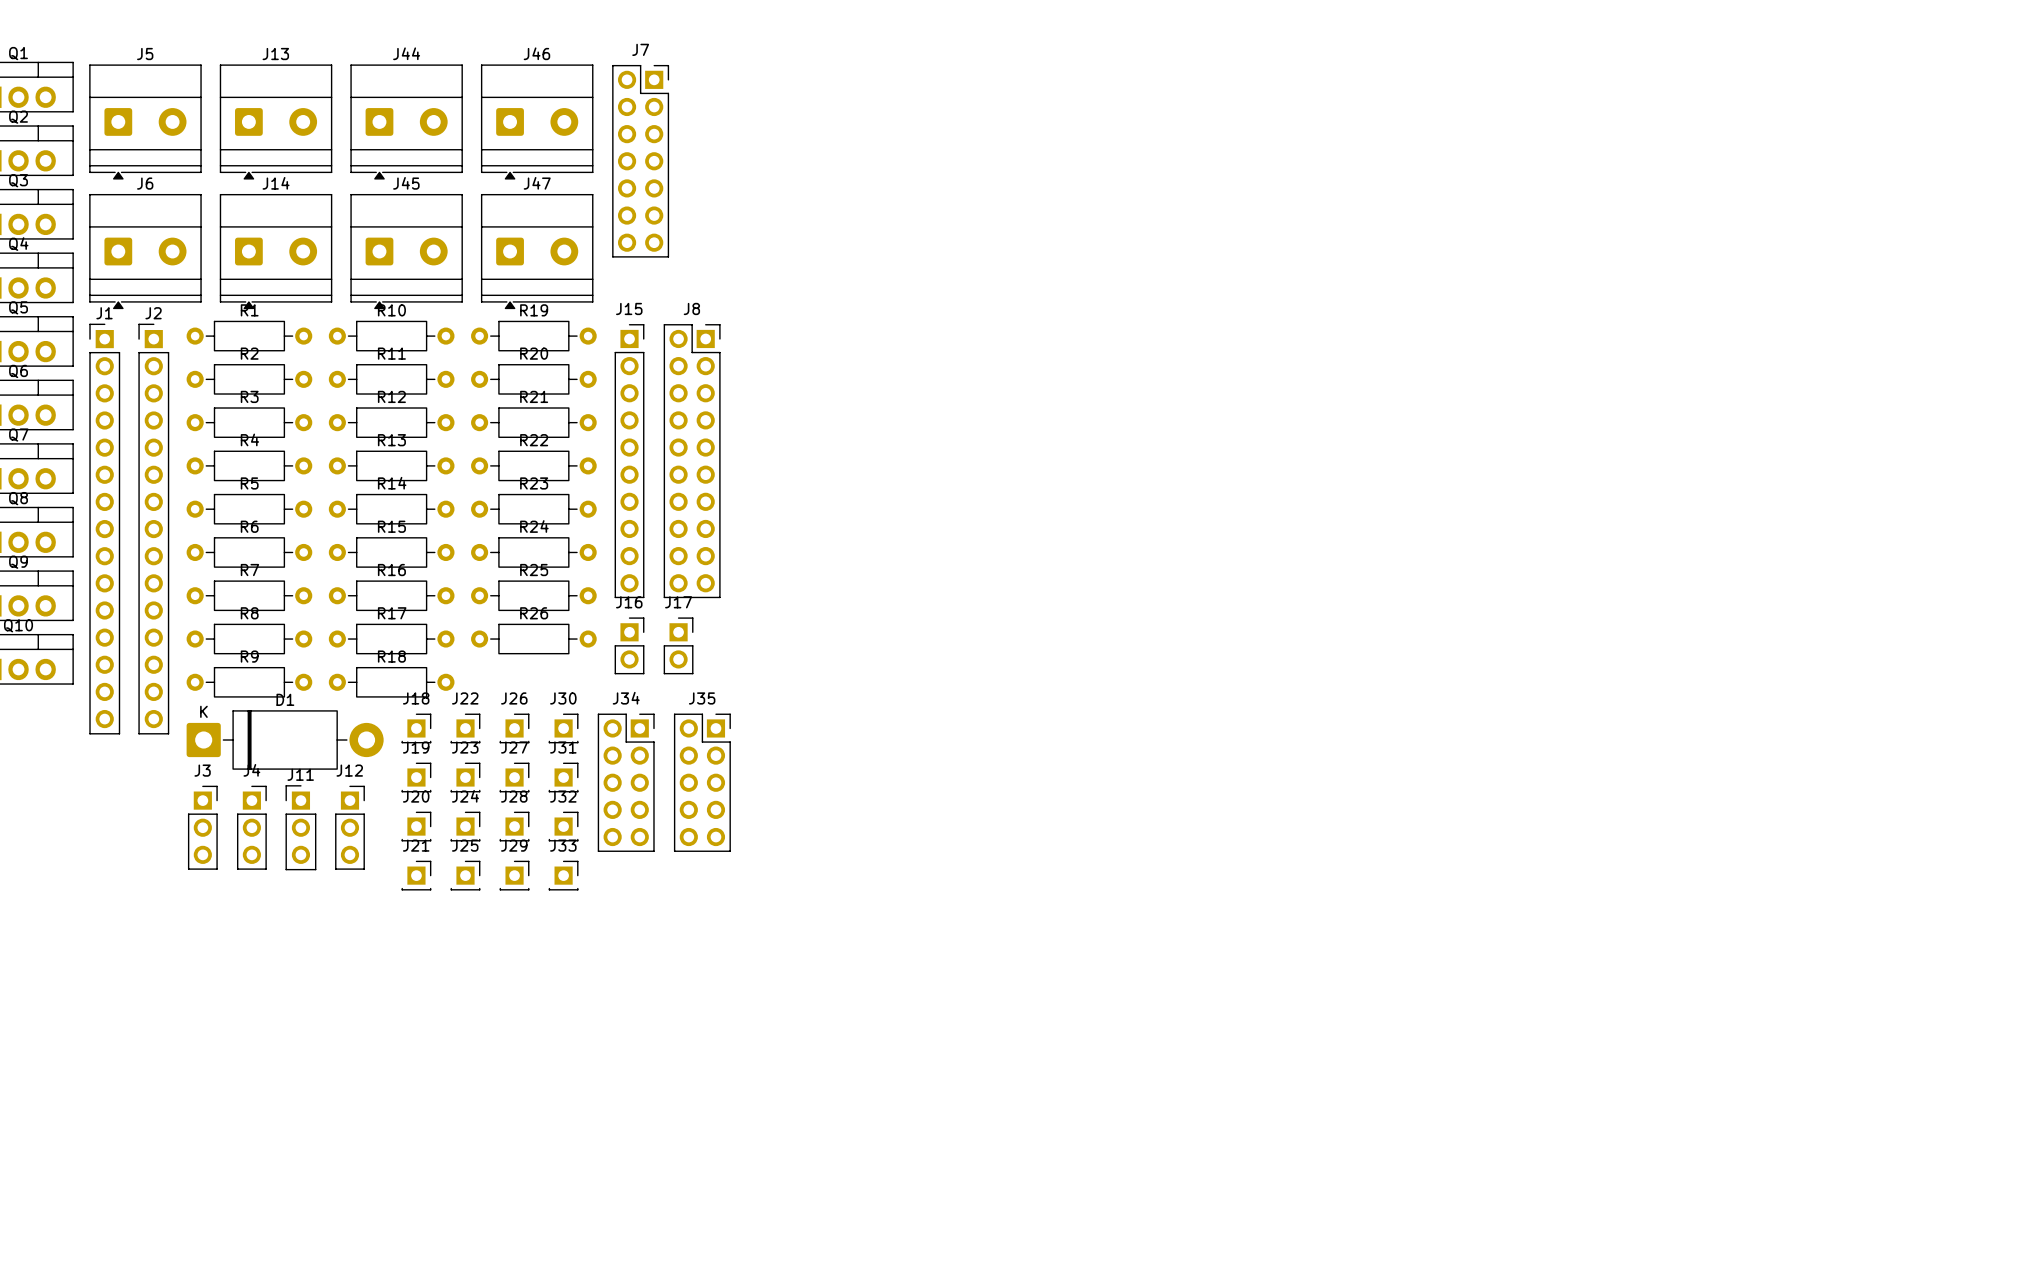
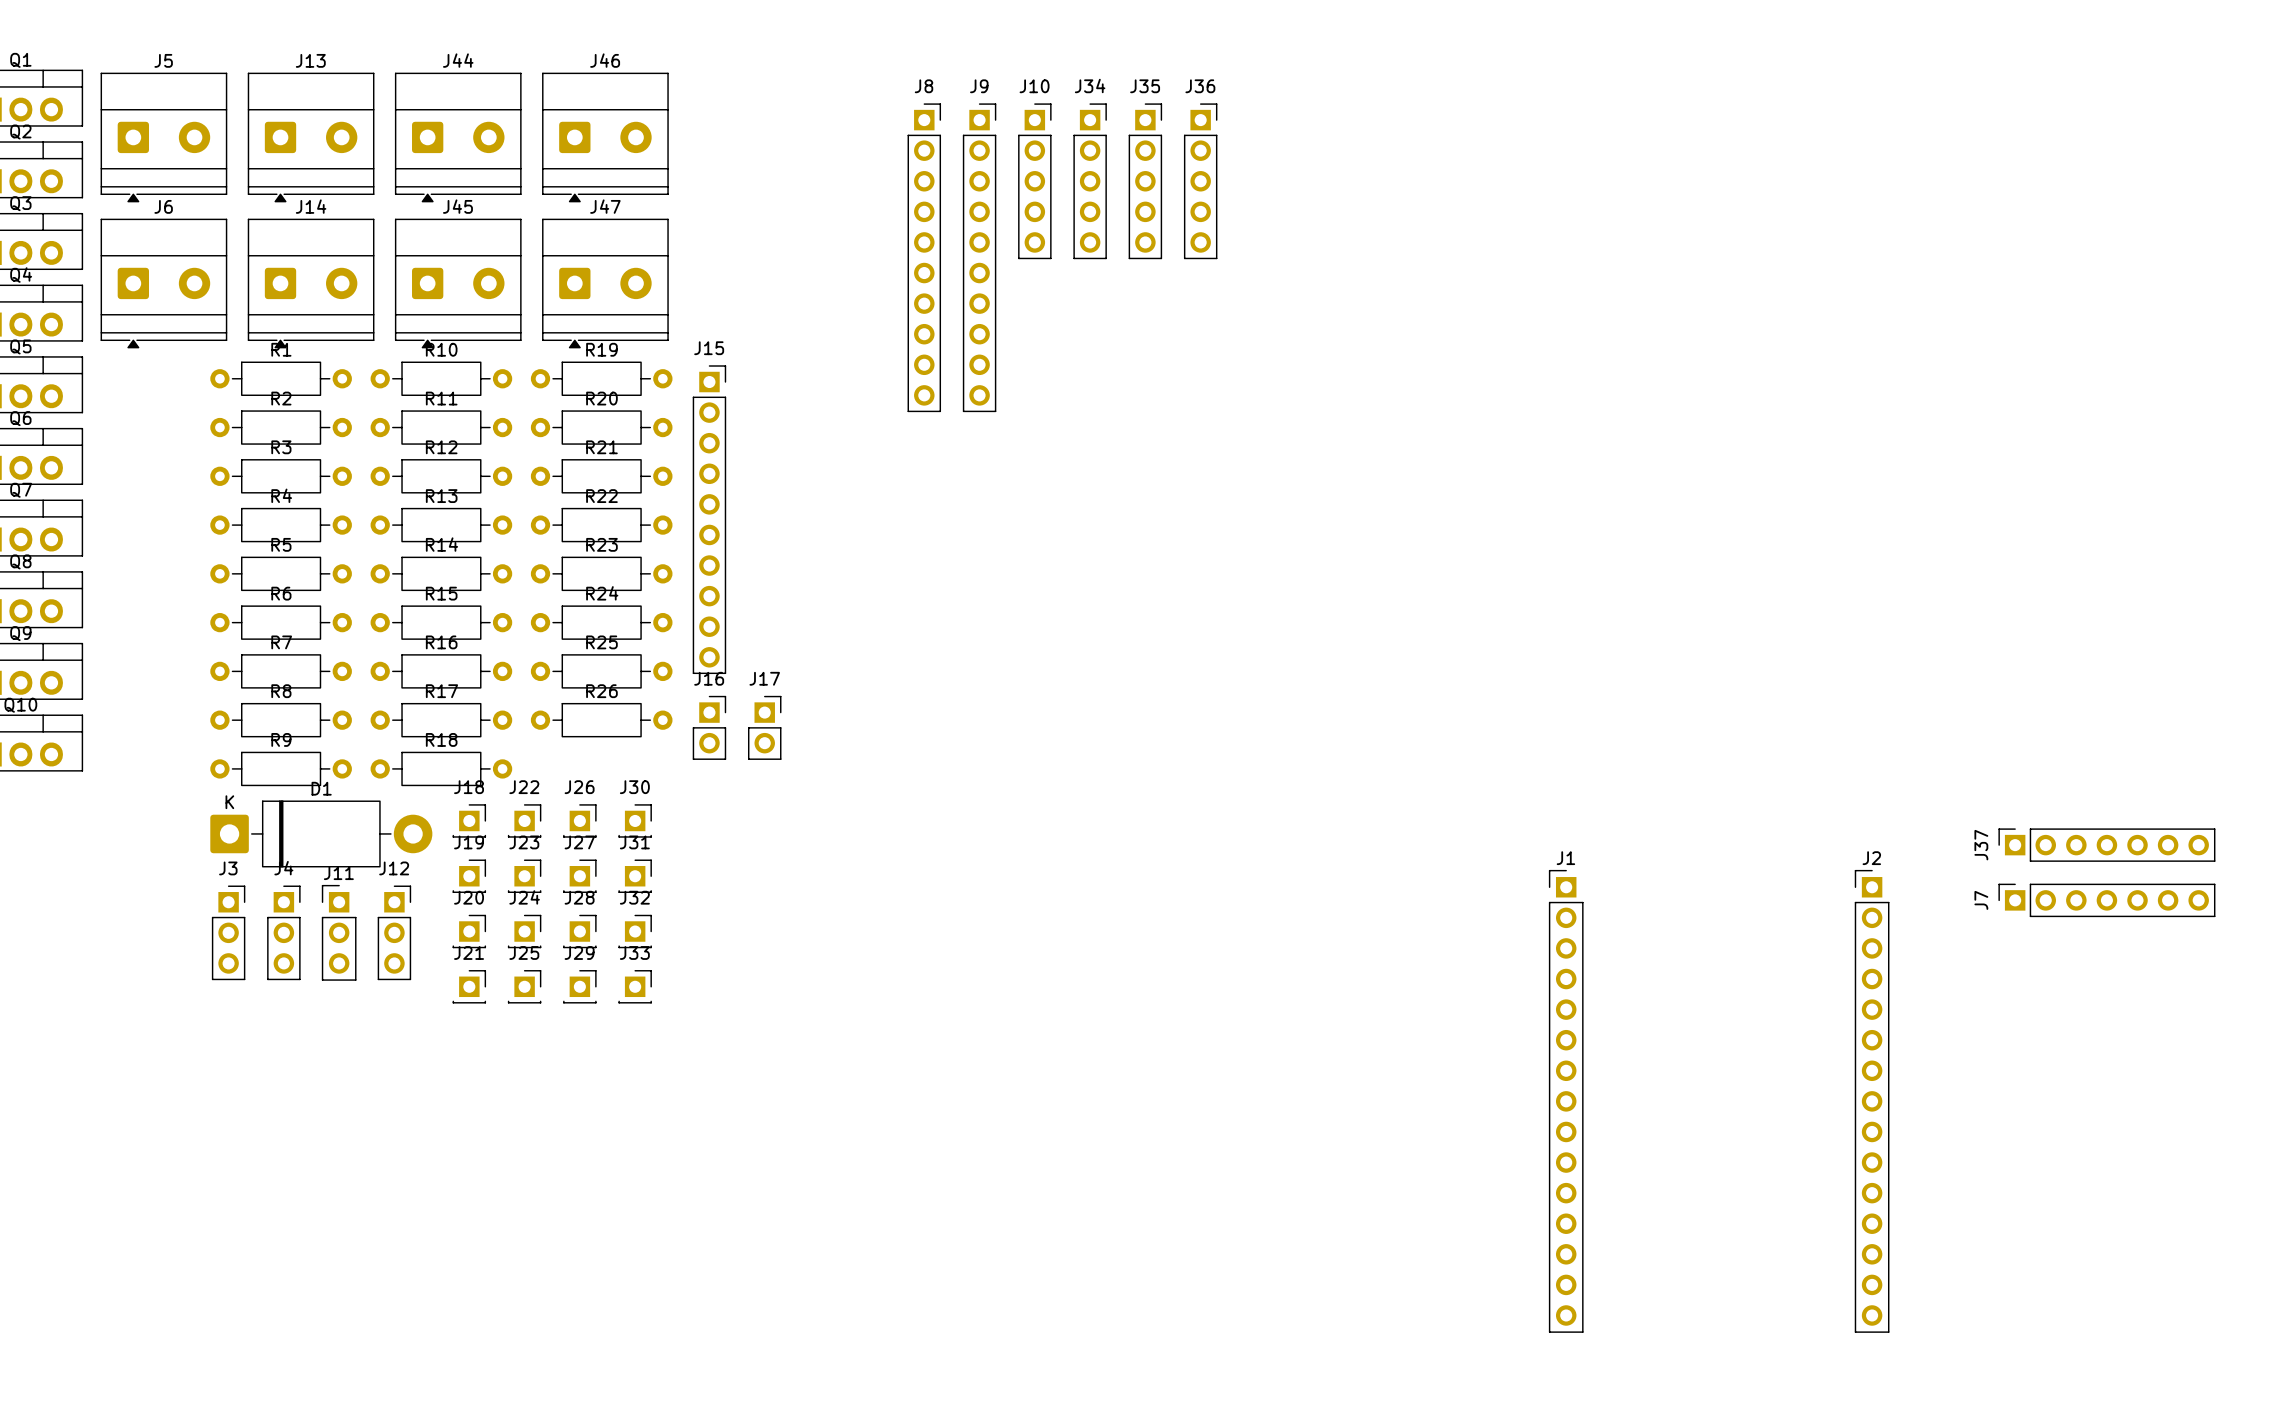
J7 name position: J7 (640, 49) -> J7 (1981, 900)
J7 footprint: [612, 64, 670, 258] -> [1998, 883, 2216, 918]
J10: none -> (1034, 181)
J36: none -> (1200, 181)
J9: none -> (979, 257)
J8 footprint: [663, 324, 721, 599] -> [907, 103, 942, 413]
J1 position: (104, 529) -> (1566, 1101)
J2 position: (153, 529) -> (1872, 1101)
J34 footprint: [597, 713, 655, 852] -> [1073, 103, 1107, 260]
J35 footprint: [673, 713, 731, 852] -> [1128, 103, 1163, 260]
J37: none -> (2106, 845)

